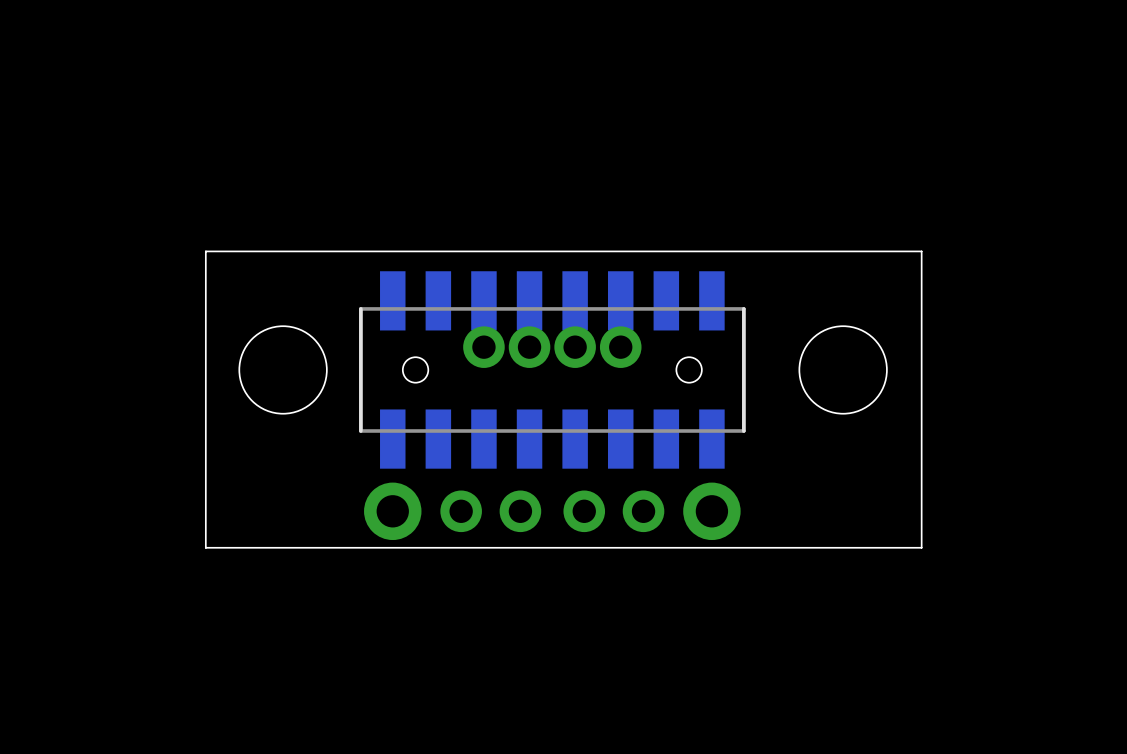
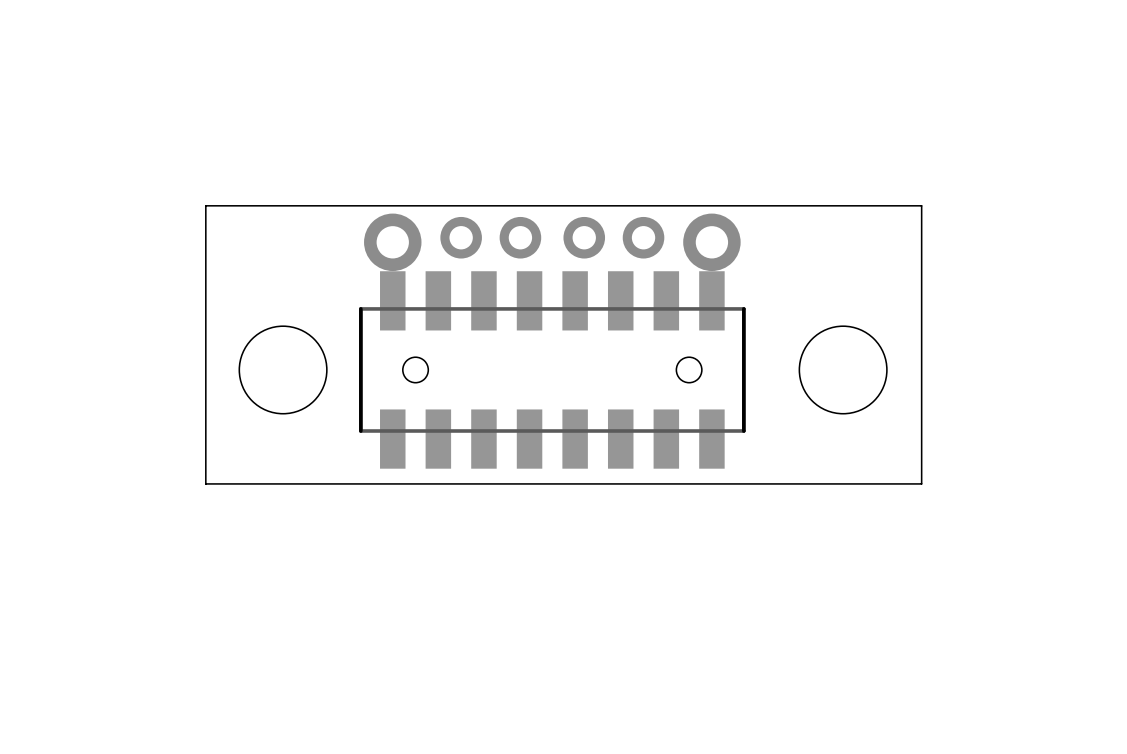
part: none -> (461, 237)
part: none -> (520, 237)
part: none -> (584, 237)
part: none -> (643, 237)
part: none -> (392, 242)
part: none -> (711, 242)
board edge: (921, 251) (205, 251) -> (921, 251) (921, 205) (205, 205) (205, 251)
part: (483, 347) -> none
part: (529, 347) -> none
part: (575, 347) -> none
part: (620, 347) -> none
board edge: (921, 483) (921, 547) (205, 547) (205, 483) -> (921, 483) (205, 483)
part: (392, 511) -> none
part: (461, 511) -> none
part: (520, 511) -> none
part: (584, 511) -> none
part: (643, 511) -> none
part: (711, 511) -> none

